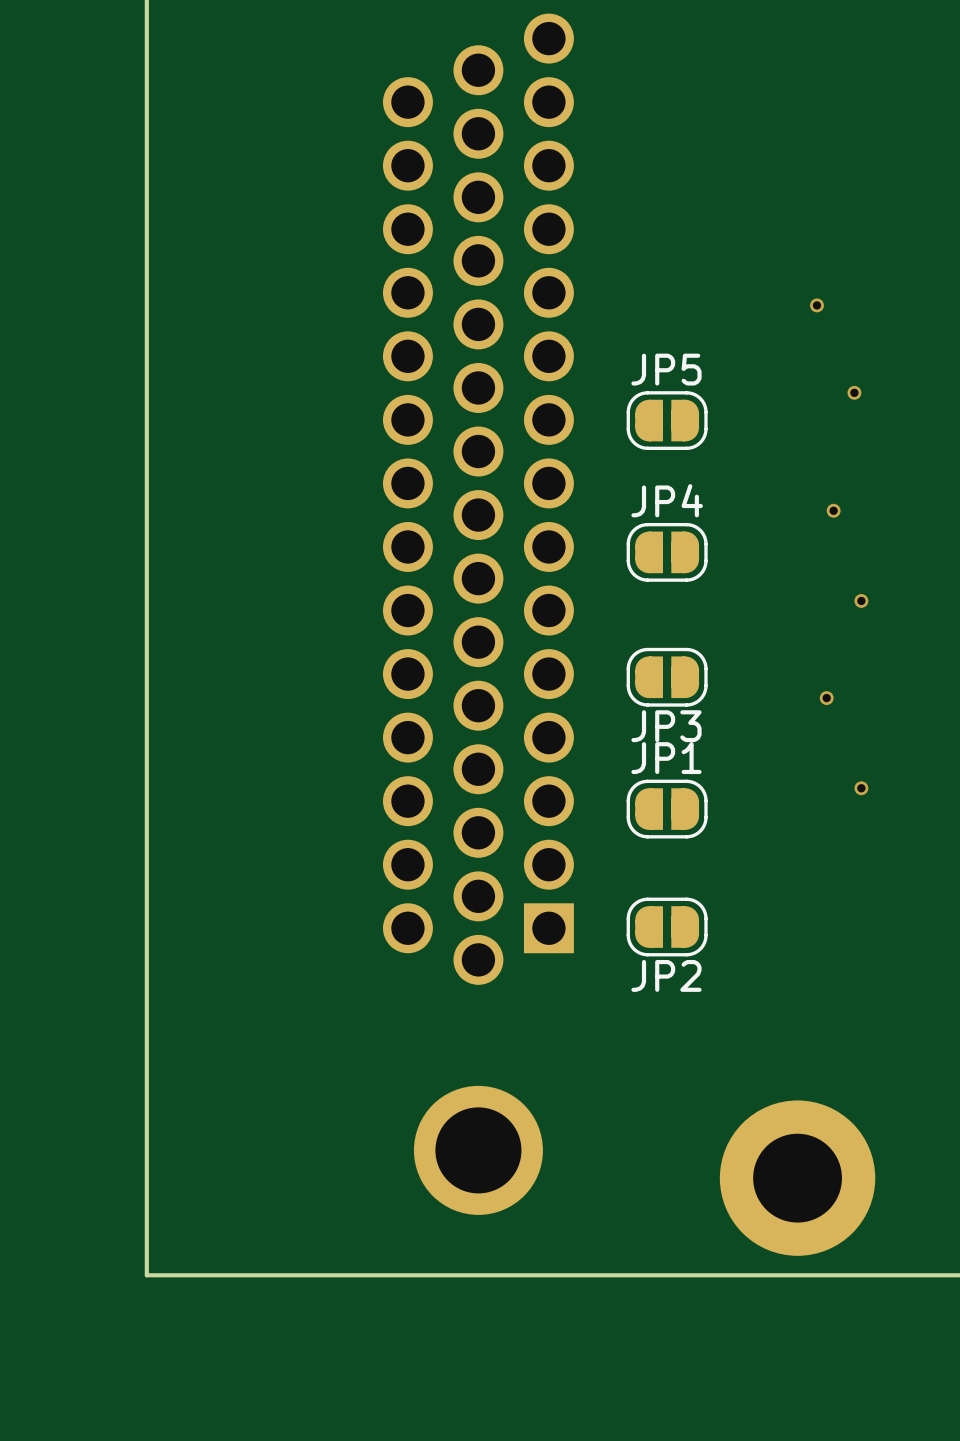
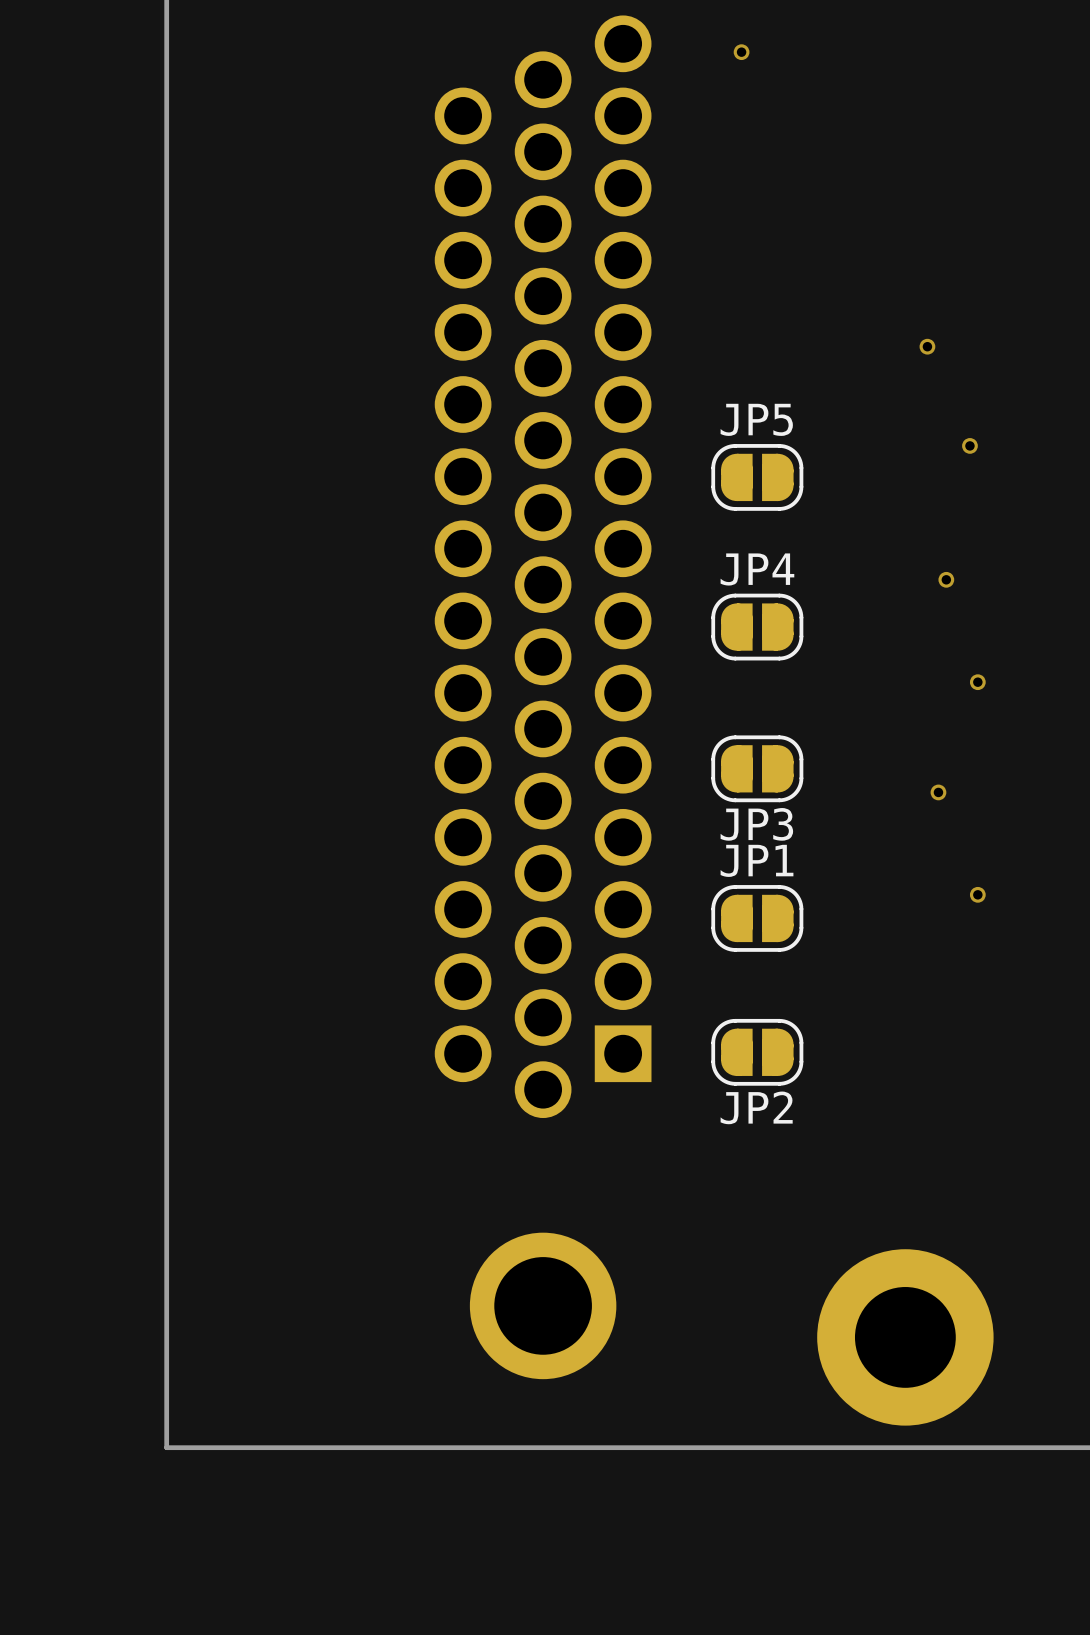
via: none -> (741, 52)

